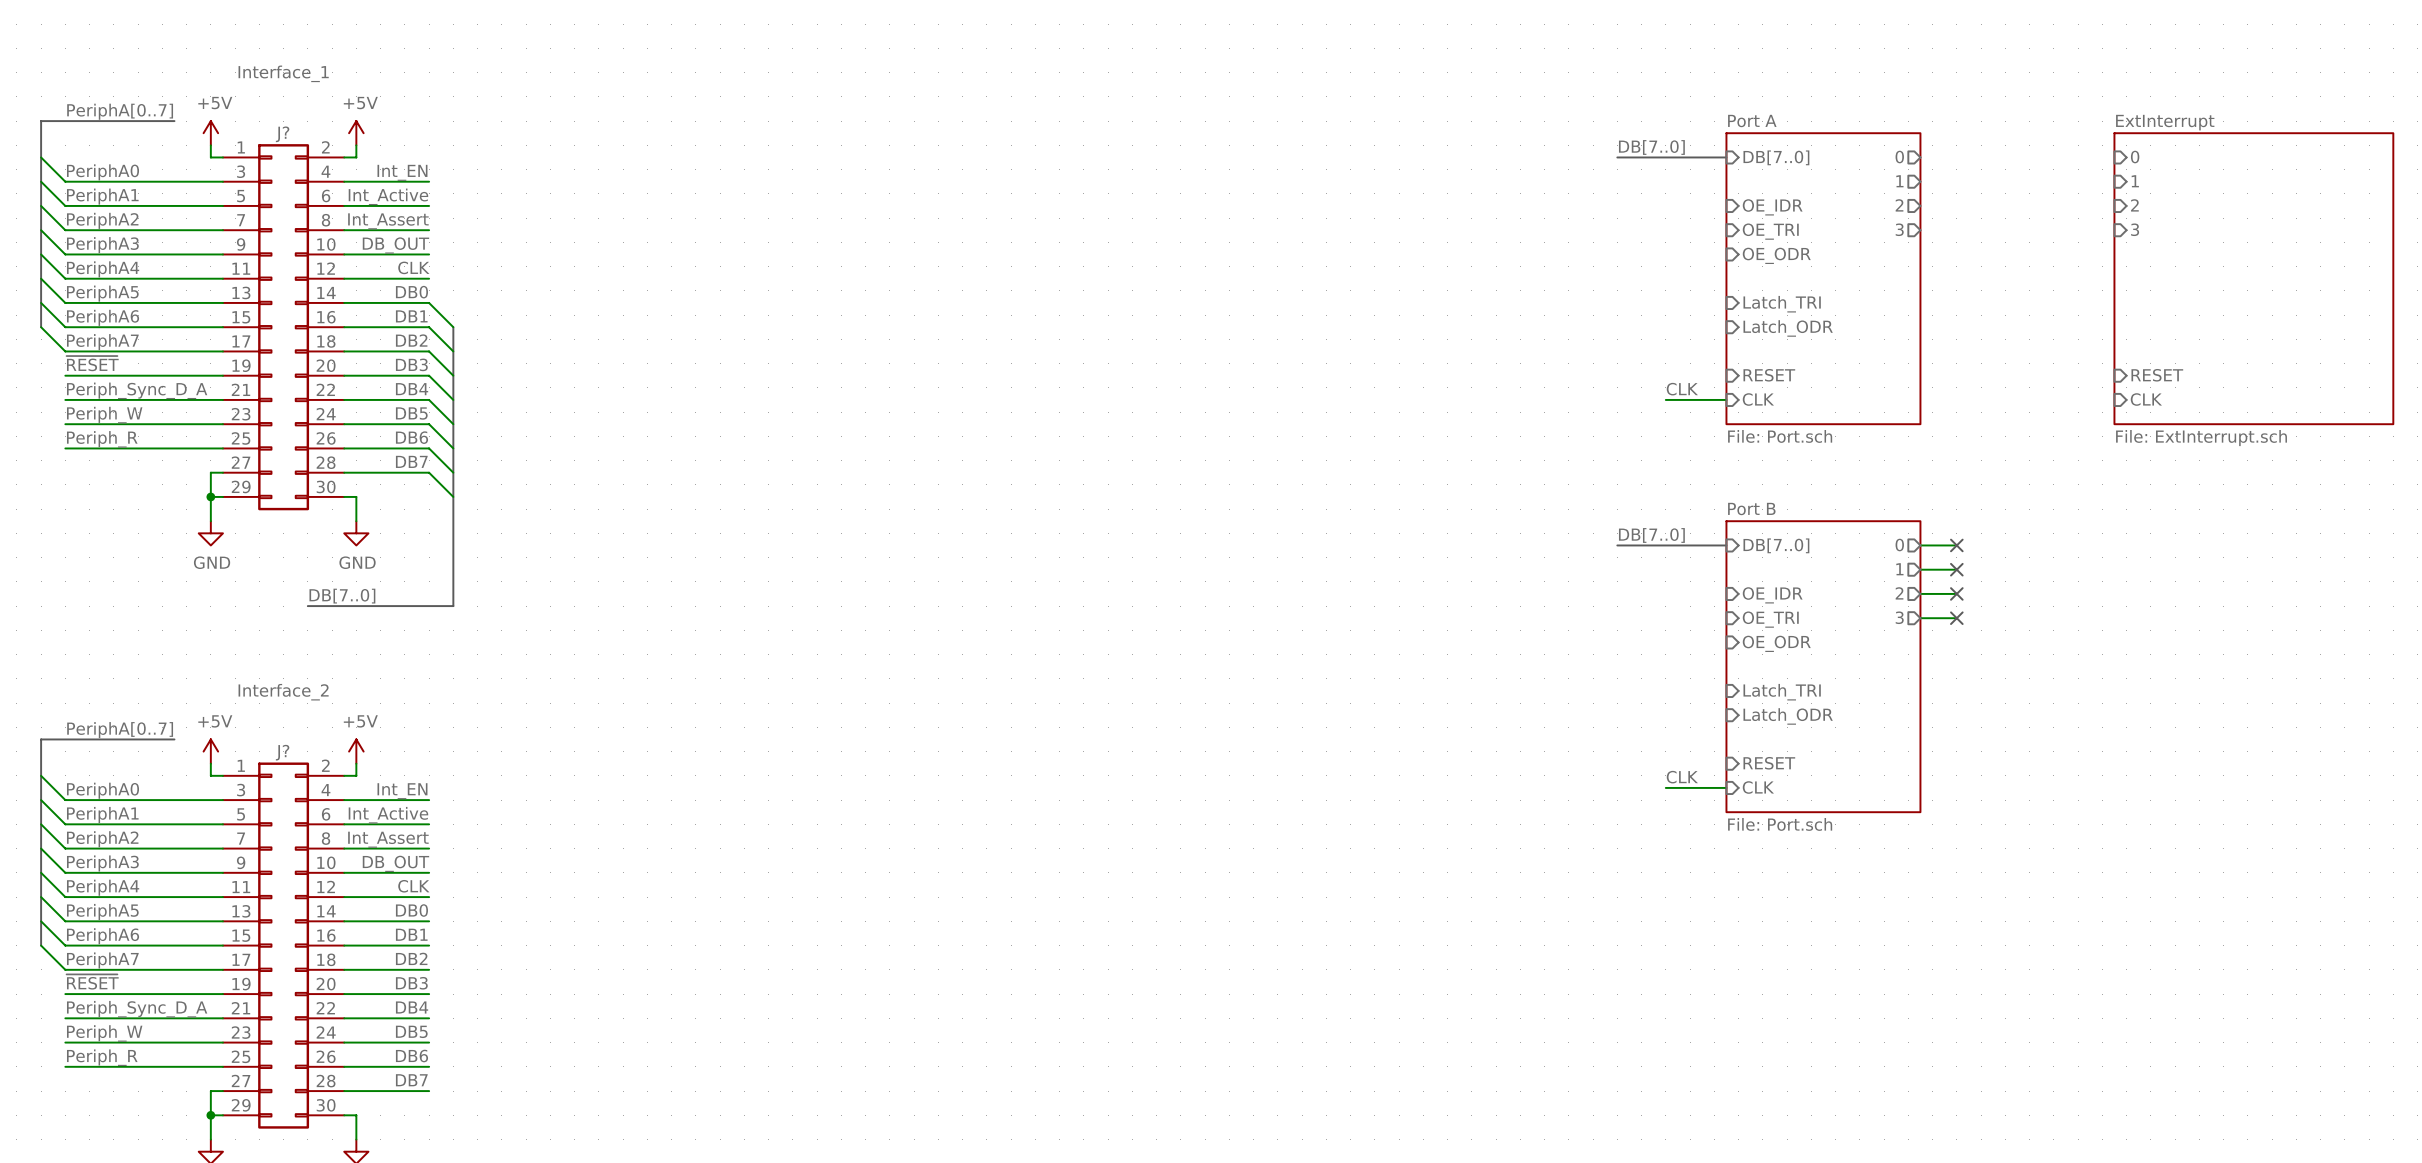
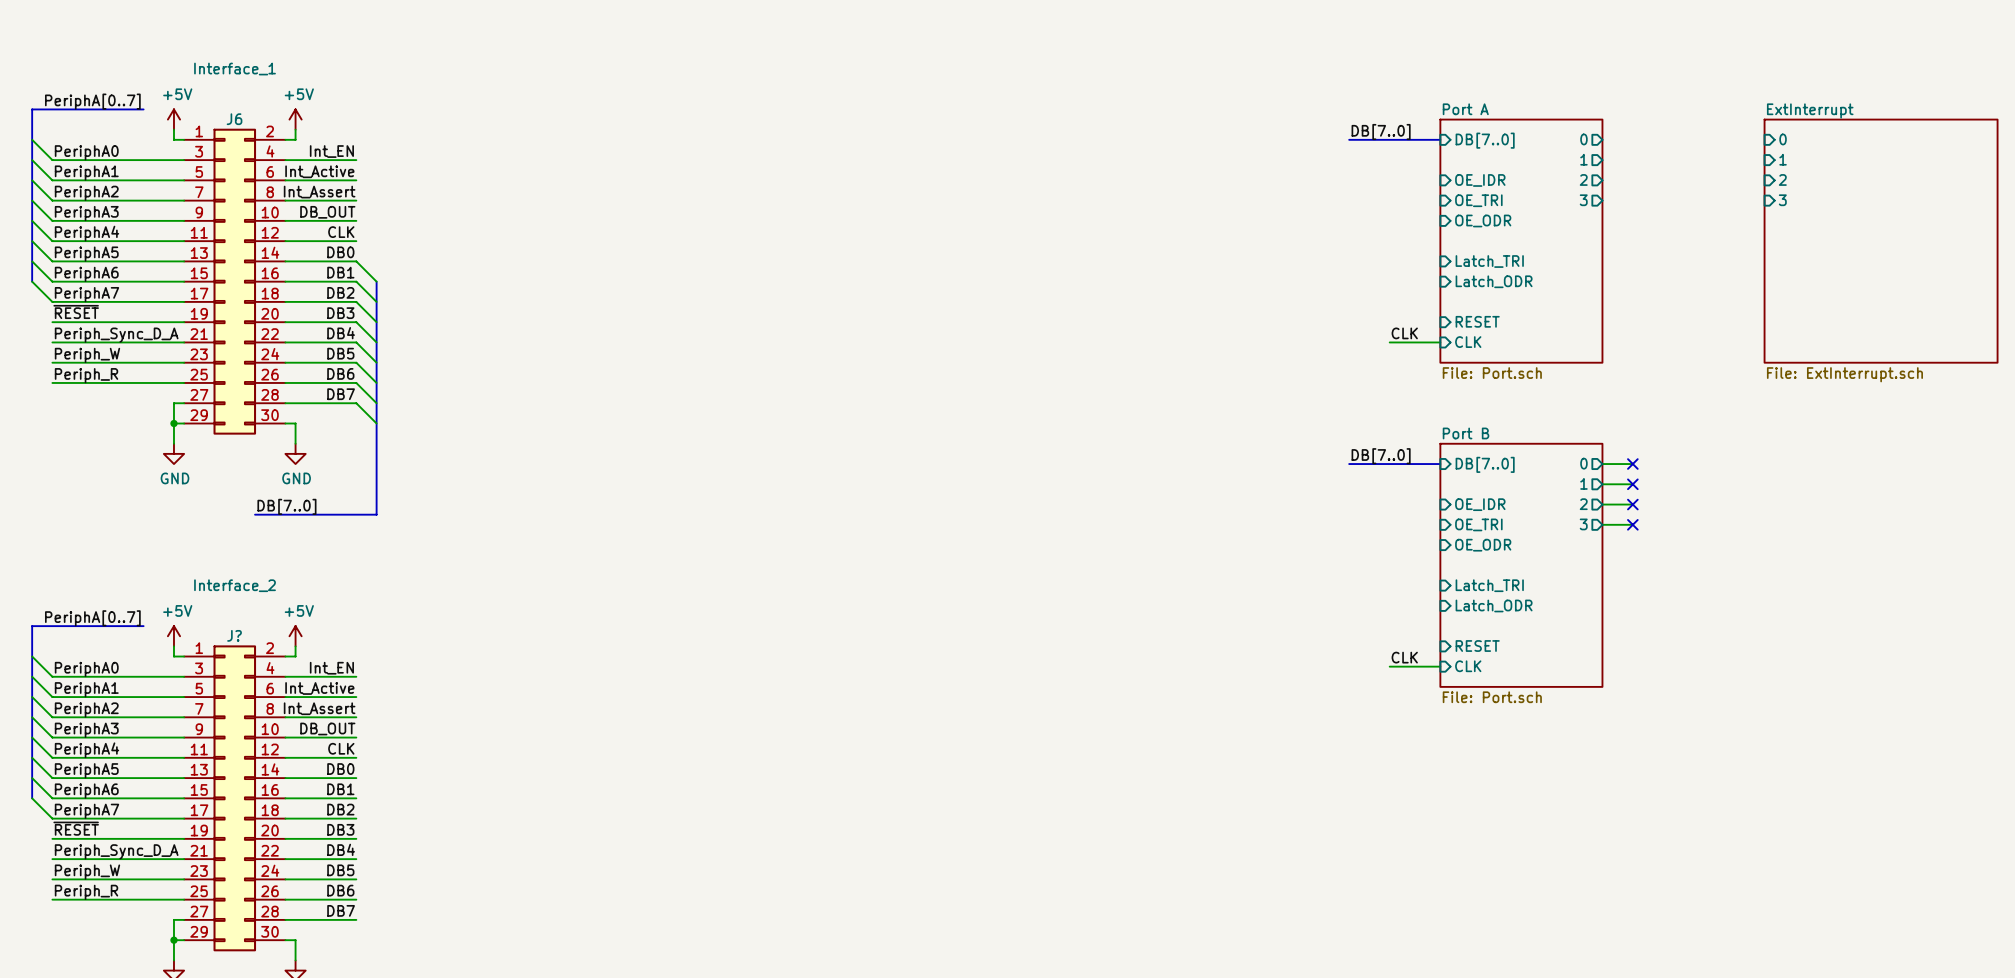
J? name: J? (282, 134) -> J6 (234, 119)
sheet pin: RESET (2157, 375) -> none
sheet pin: CLK (2146, 399) -> none

